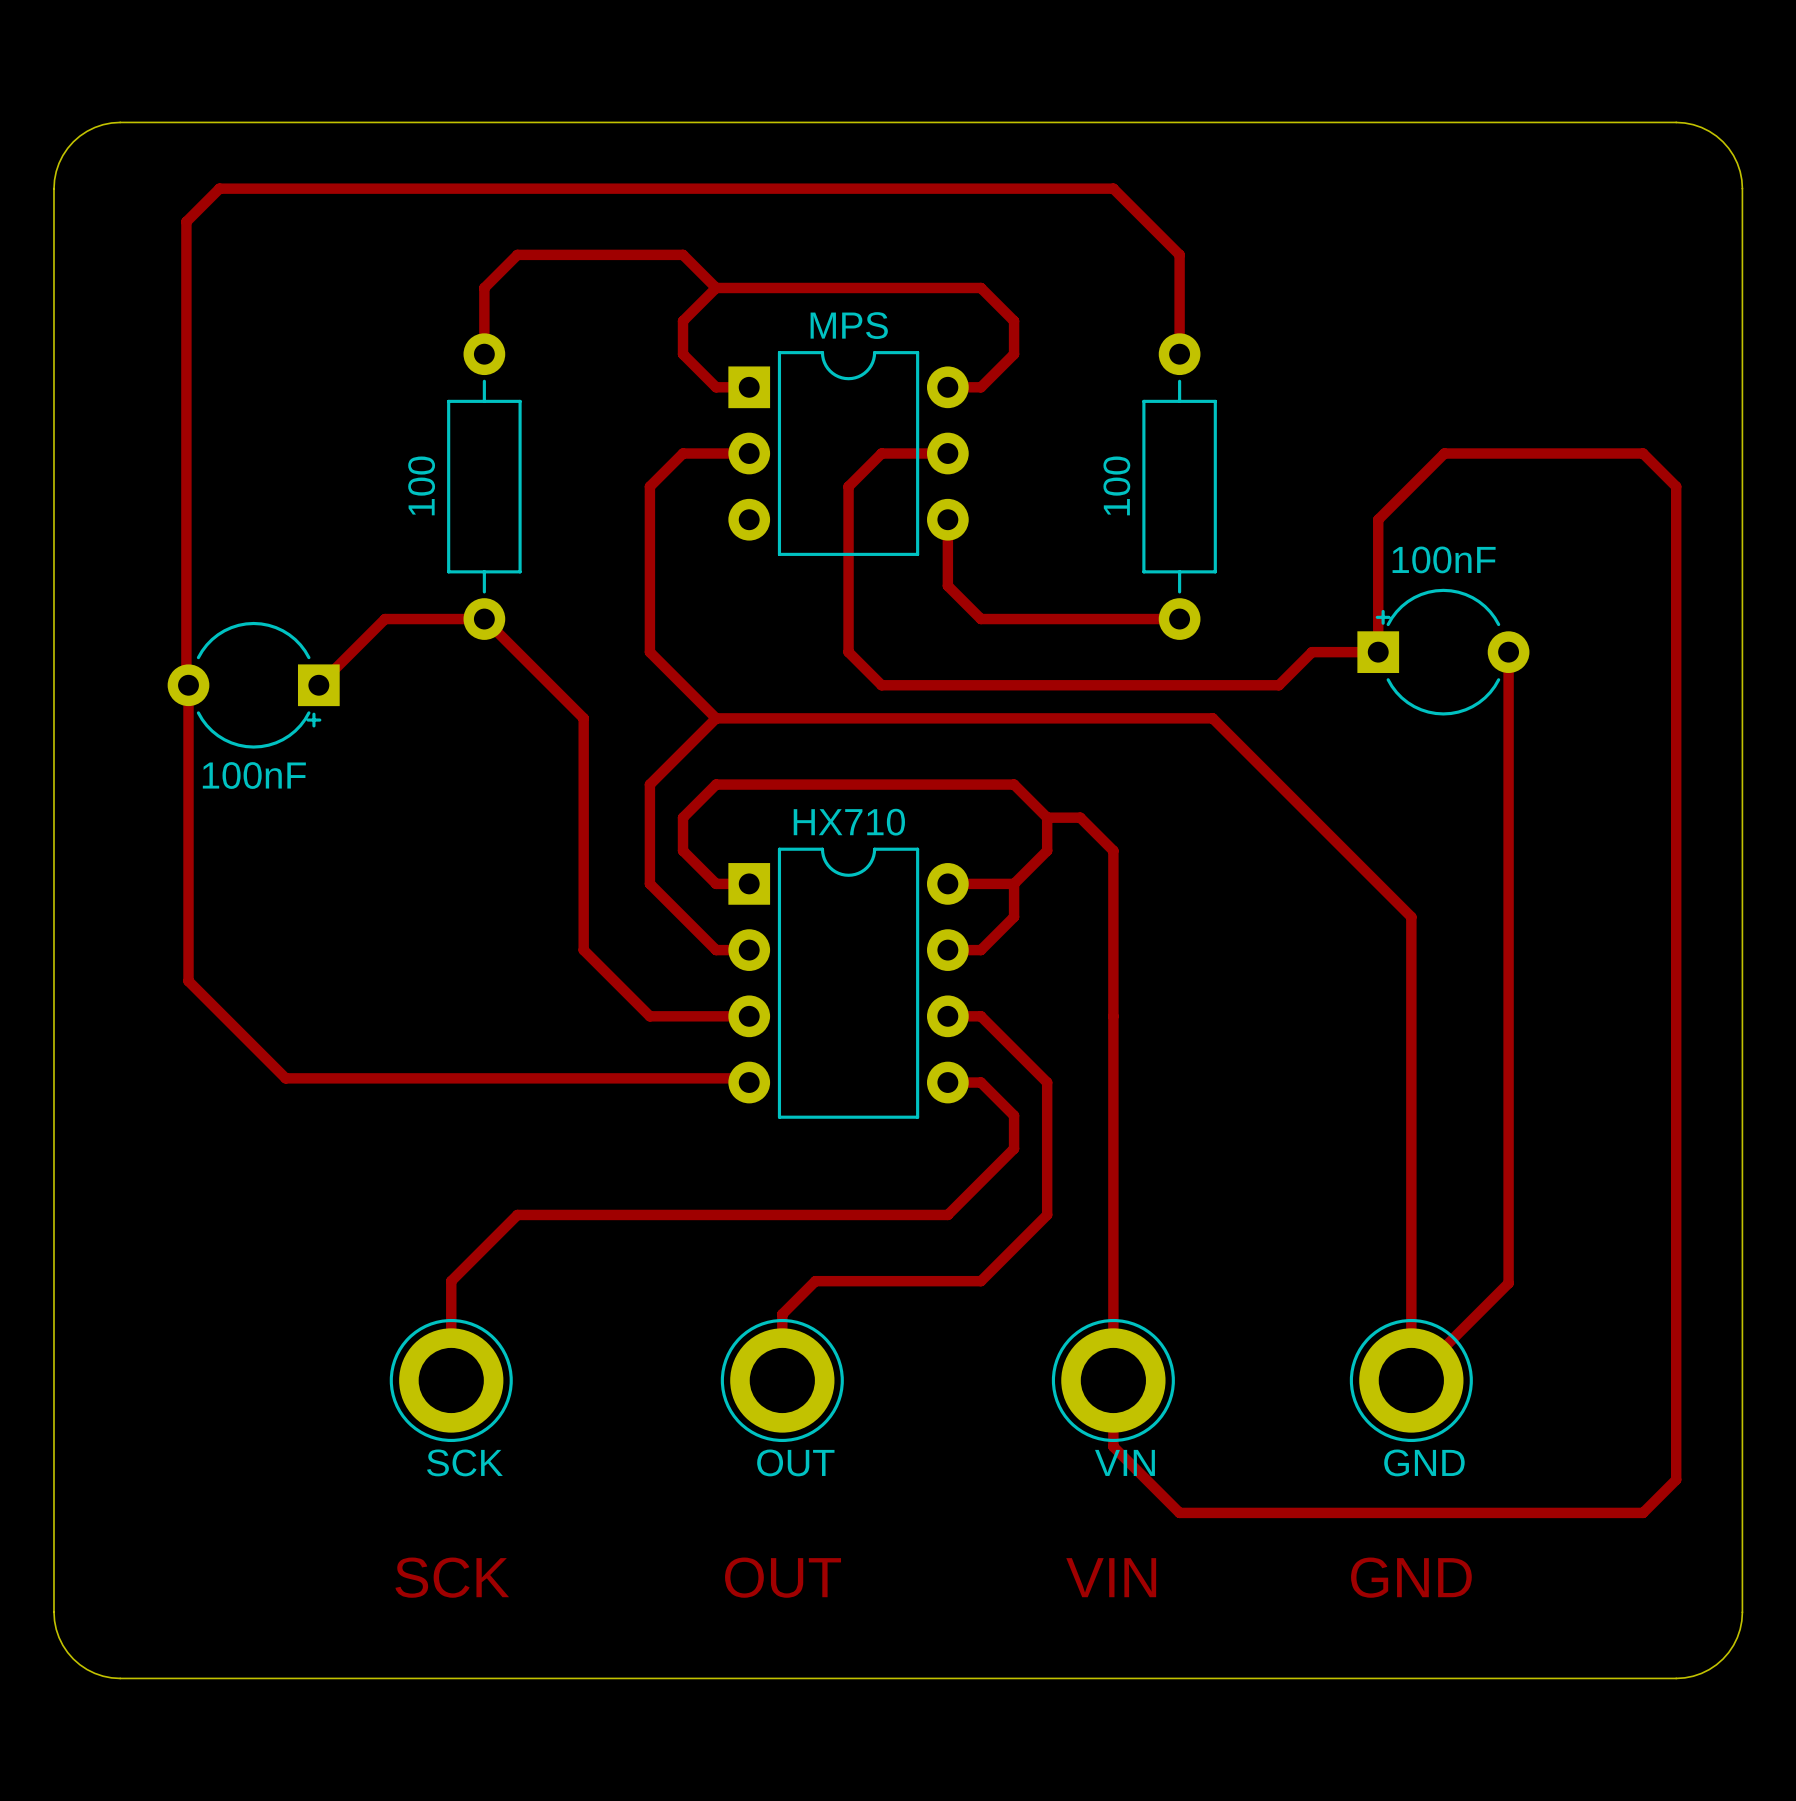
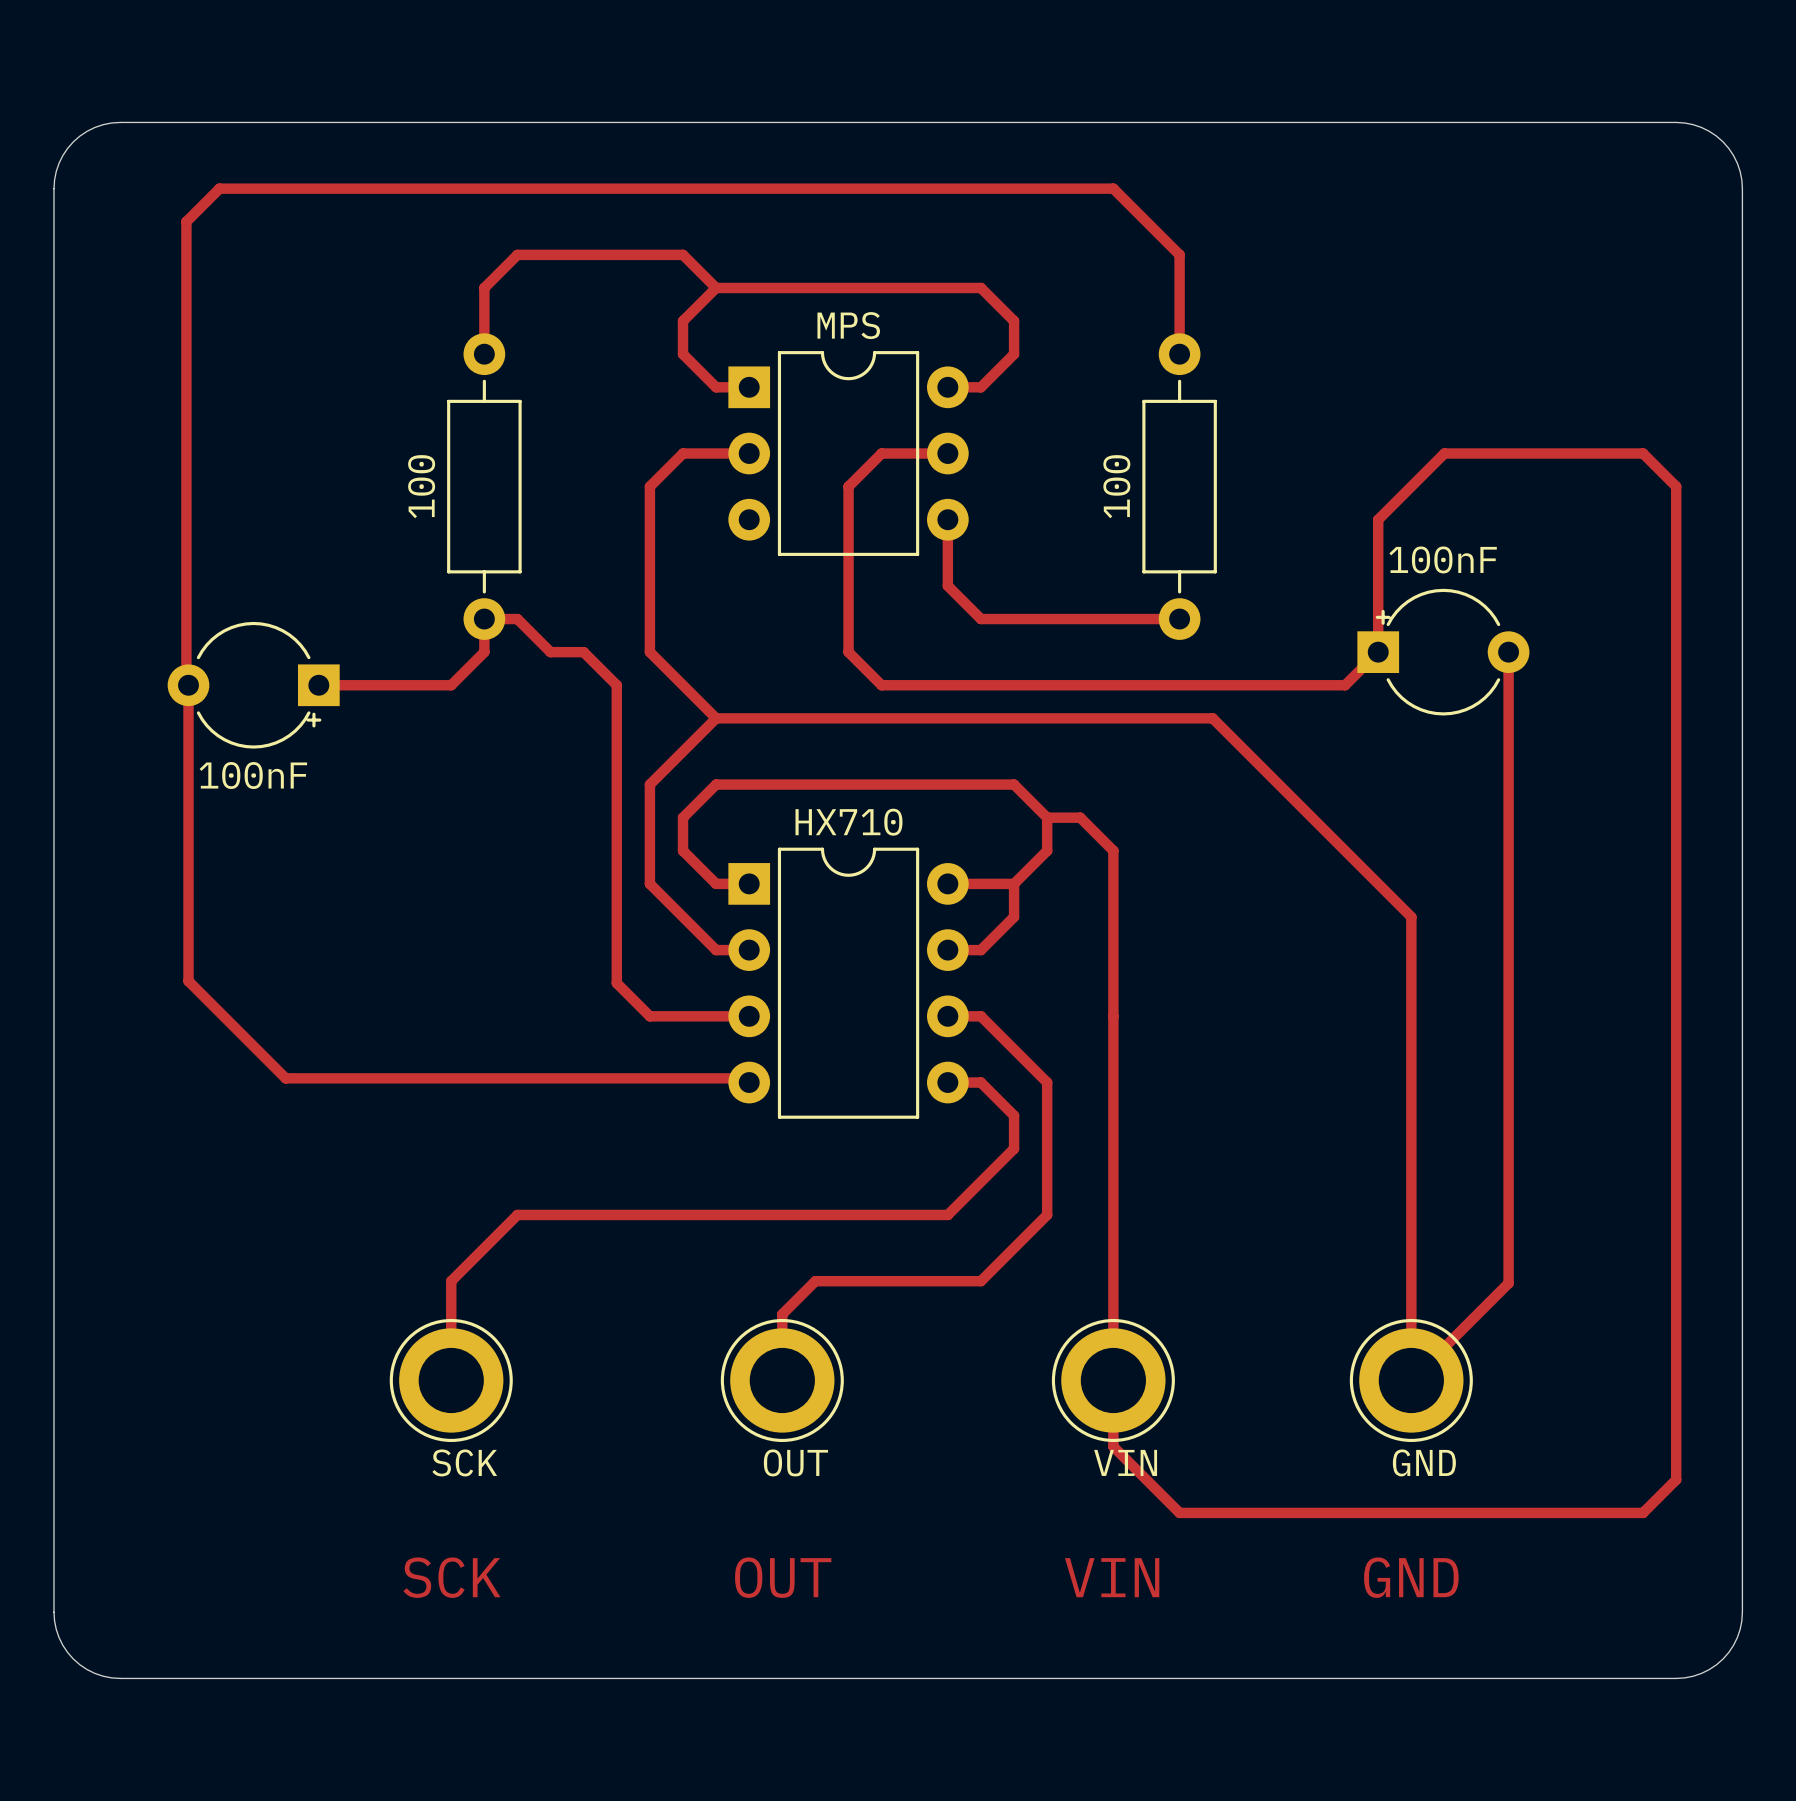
track: (1378, 652) (1312, 652) (1278, 685) -> (1378, 652) (1345, 685) (1278, 685)
track: (318, 685) (385, 619) (484, 619) (583, 718) (583, 950) (616, 983) -> (318, 685) (451, 685) (484, 652) (484, 619) (517, 619) (550, 652) (583, 652) (616, 685) (616, 983)

